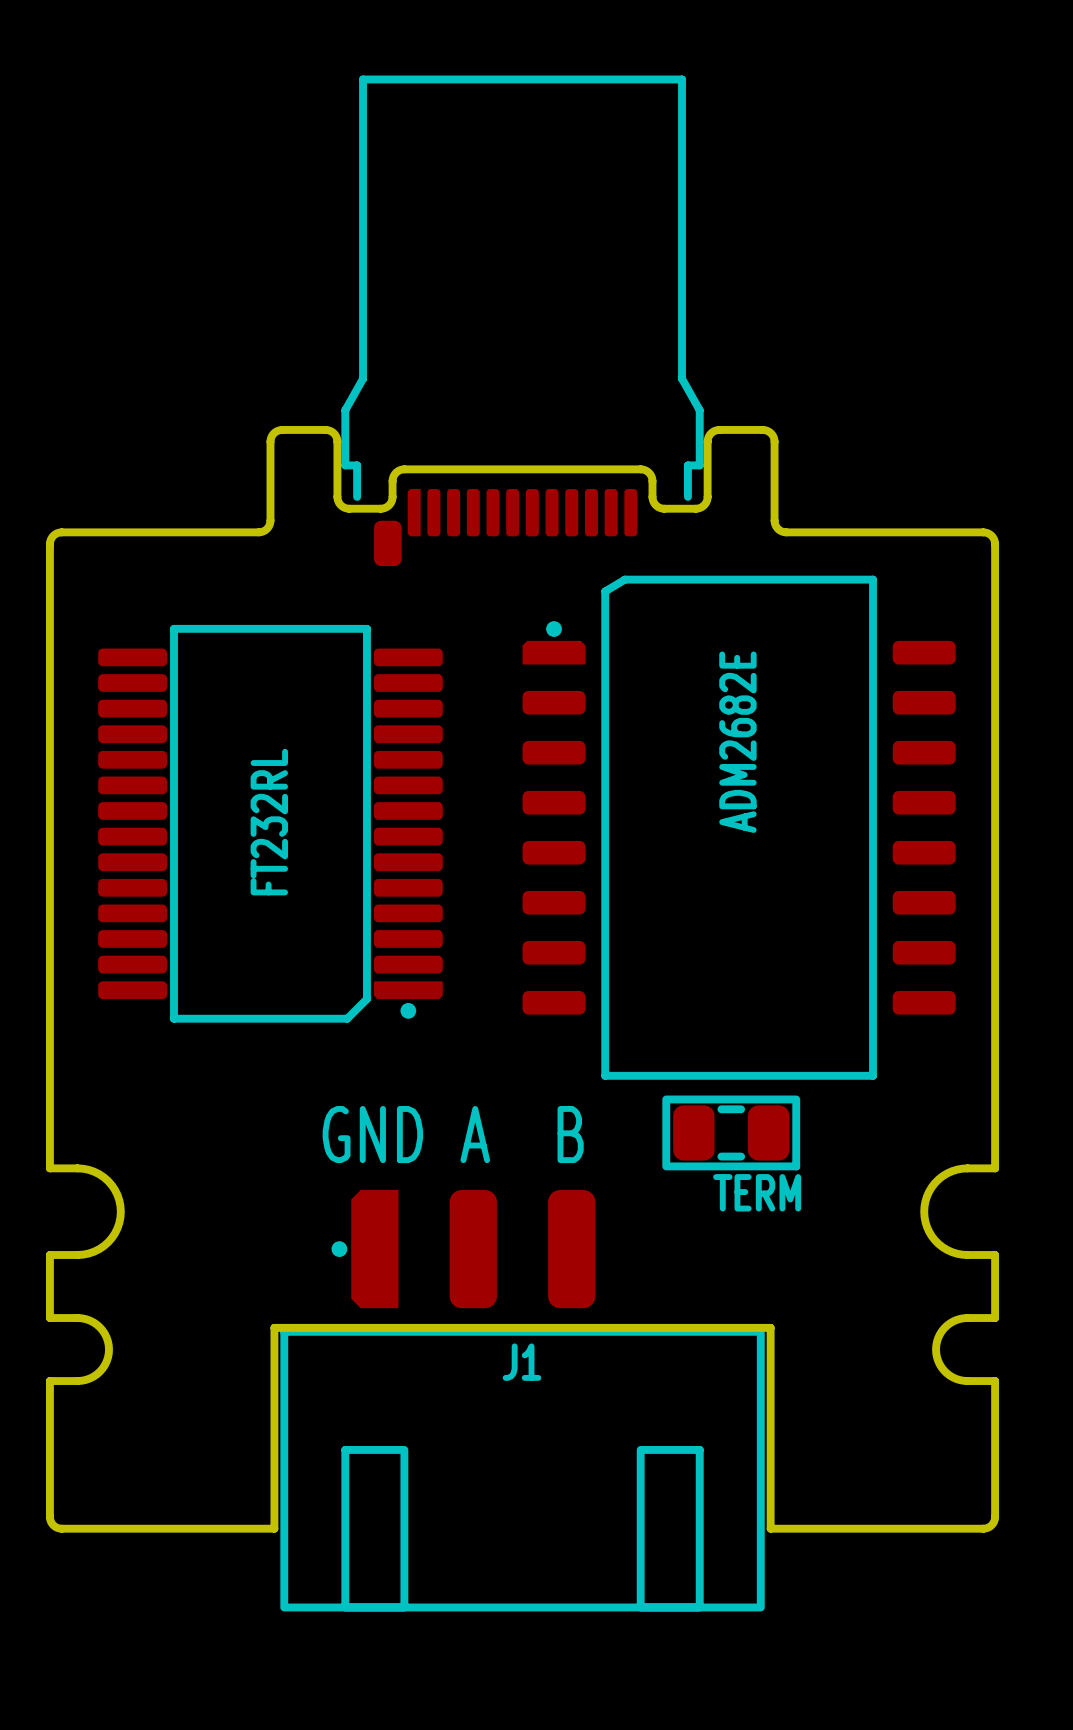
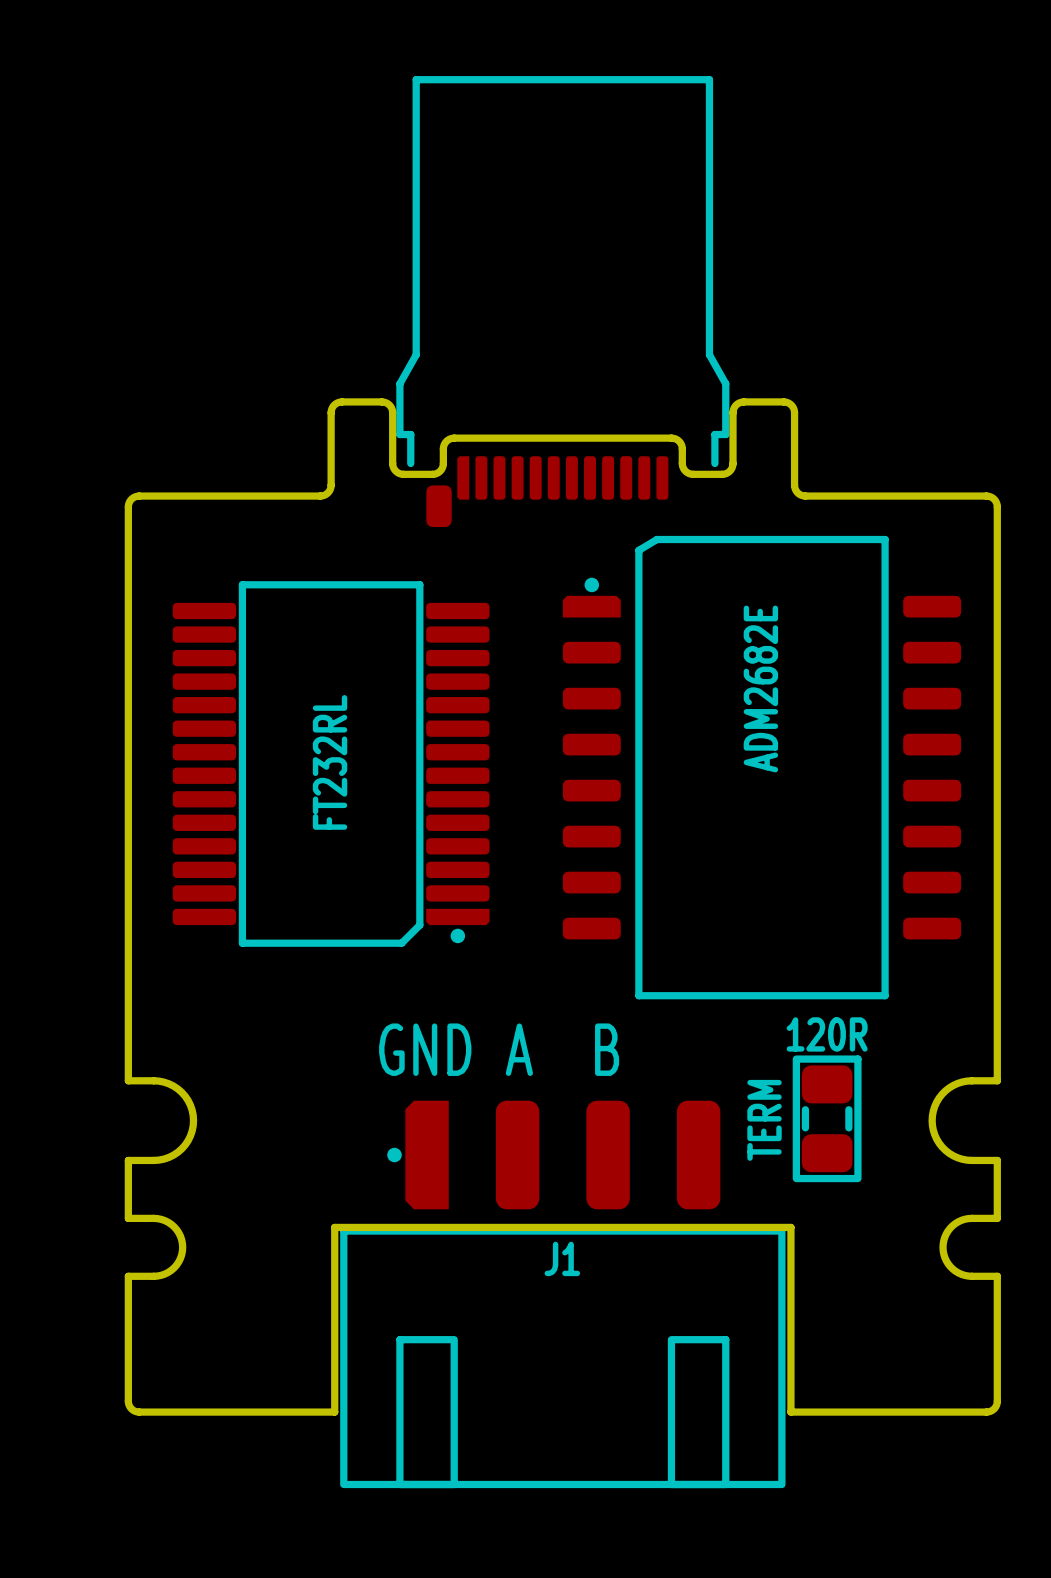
part: TERM (731, 1132) -> none
J1 footprint: [280, 1190, 765, 1612] -> [340, 1100, 786, 1489]
part: none -> 120R (827, 1118)
text: none -> TERM (764, 1120)

